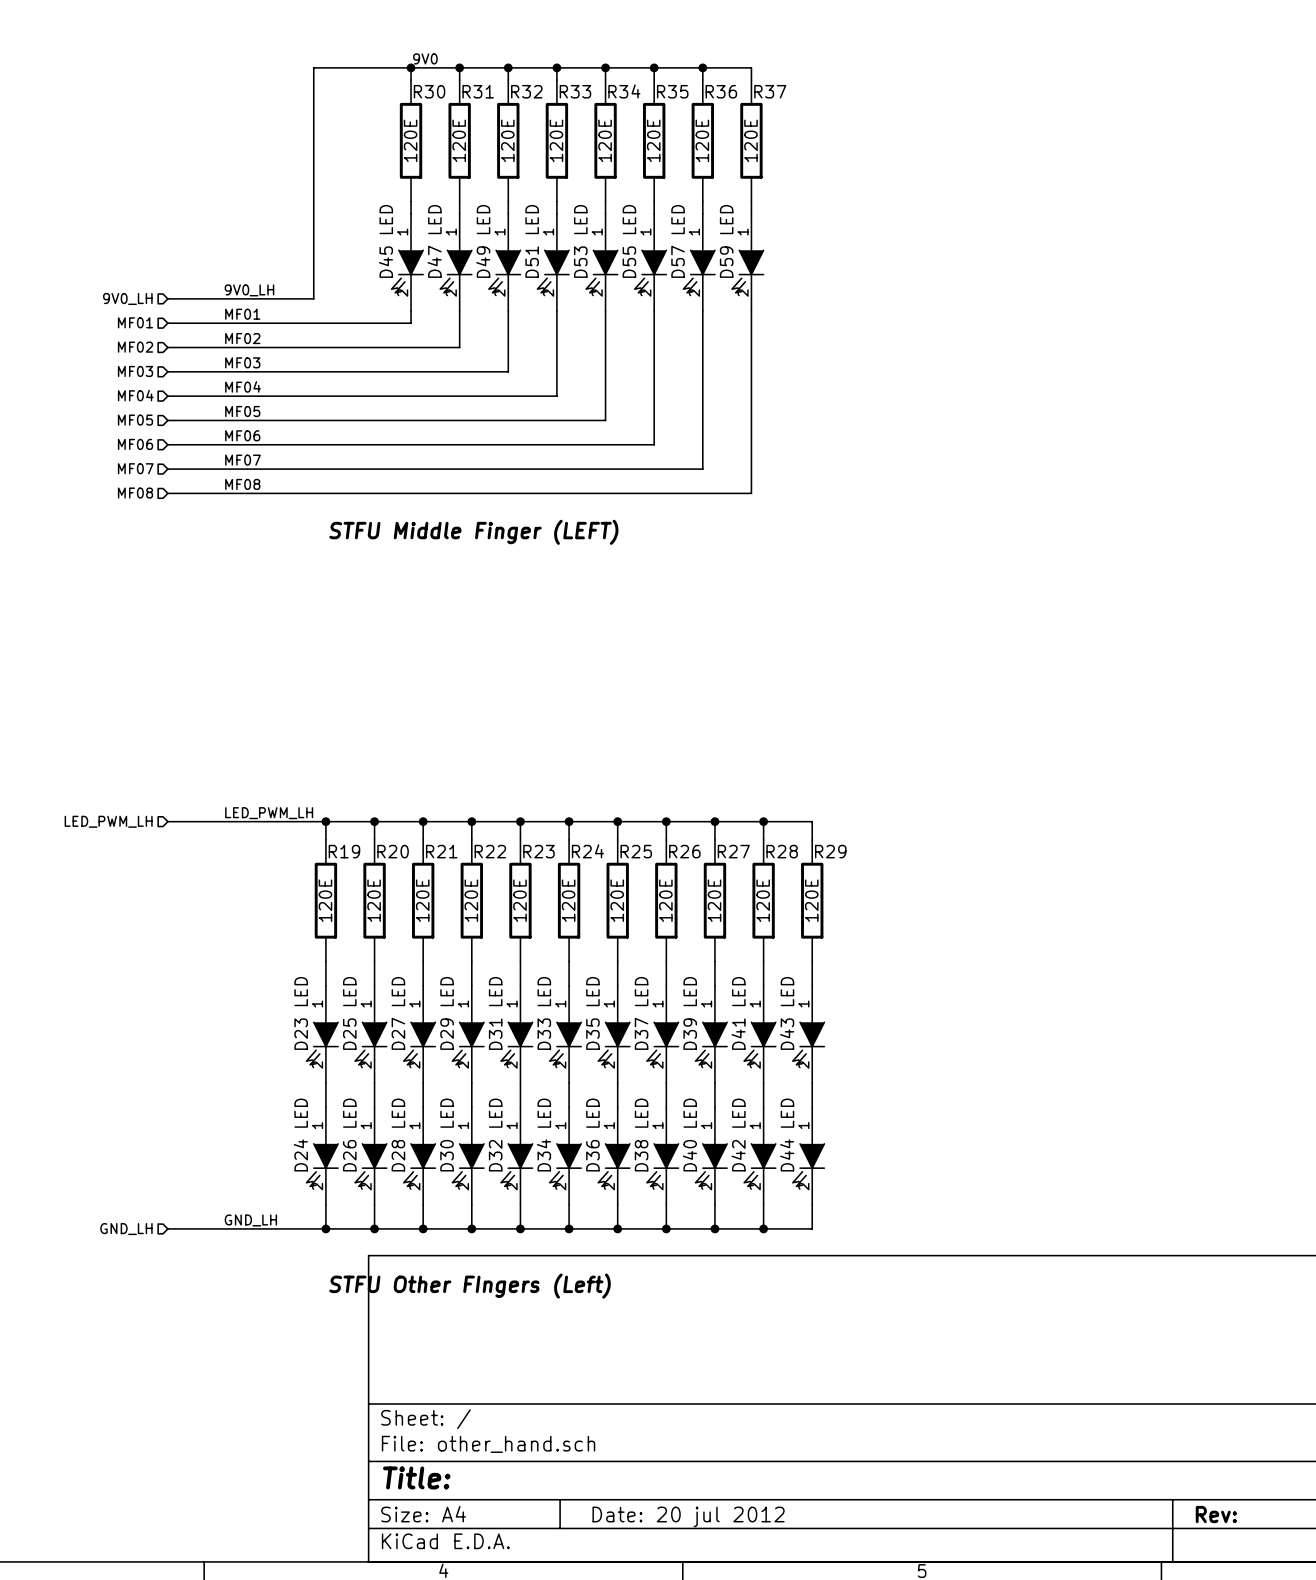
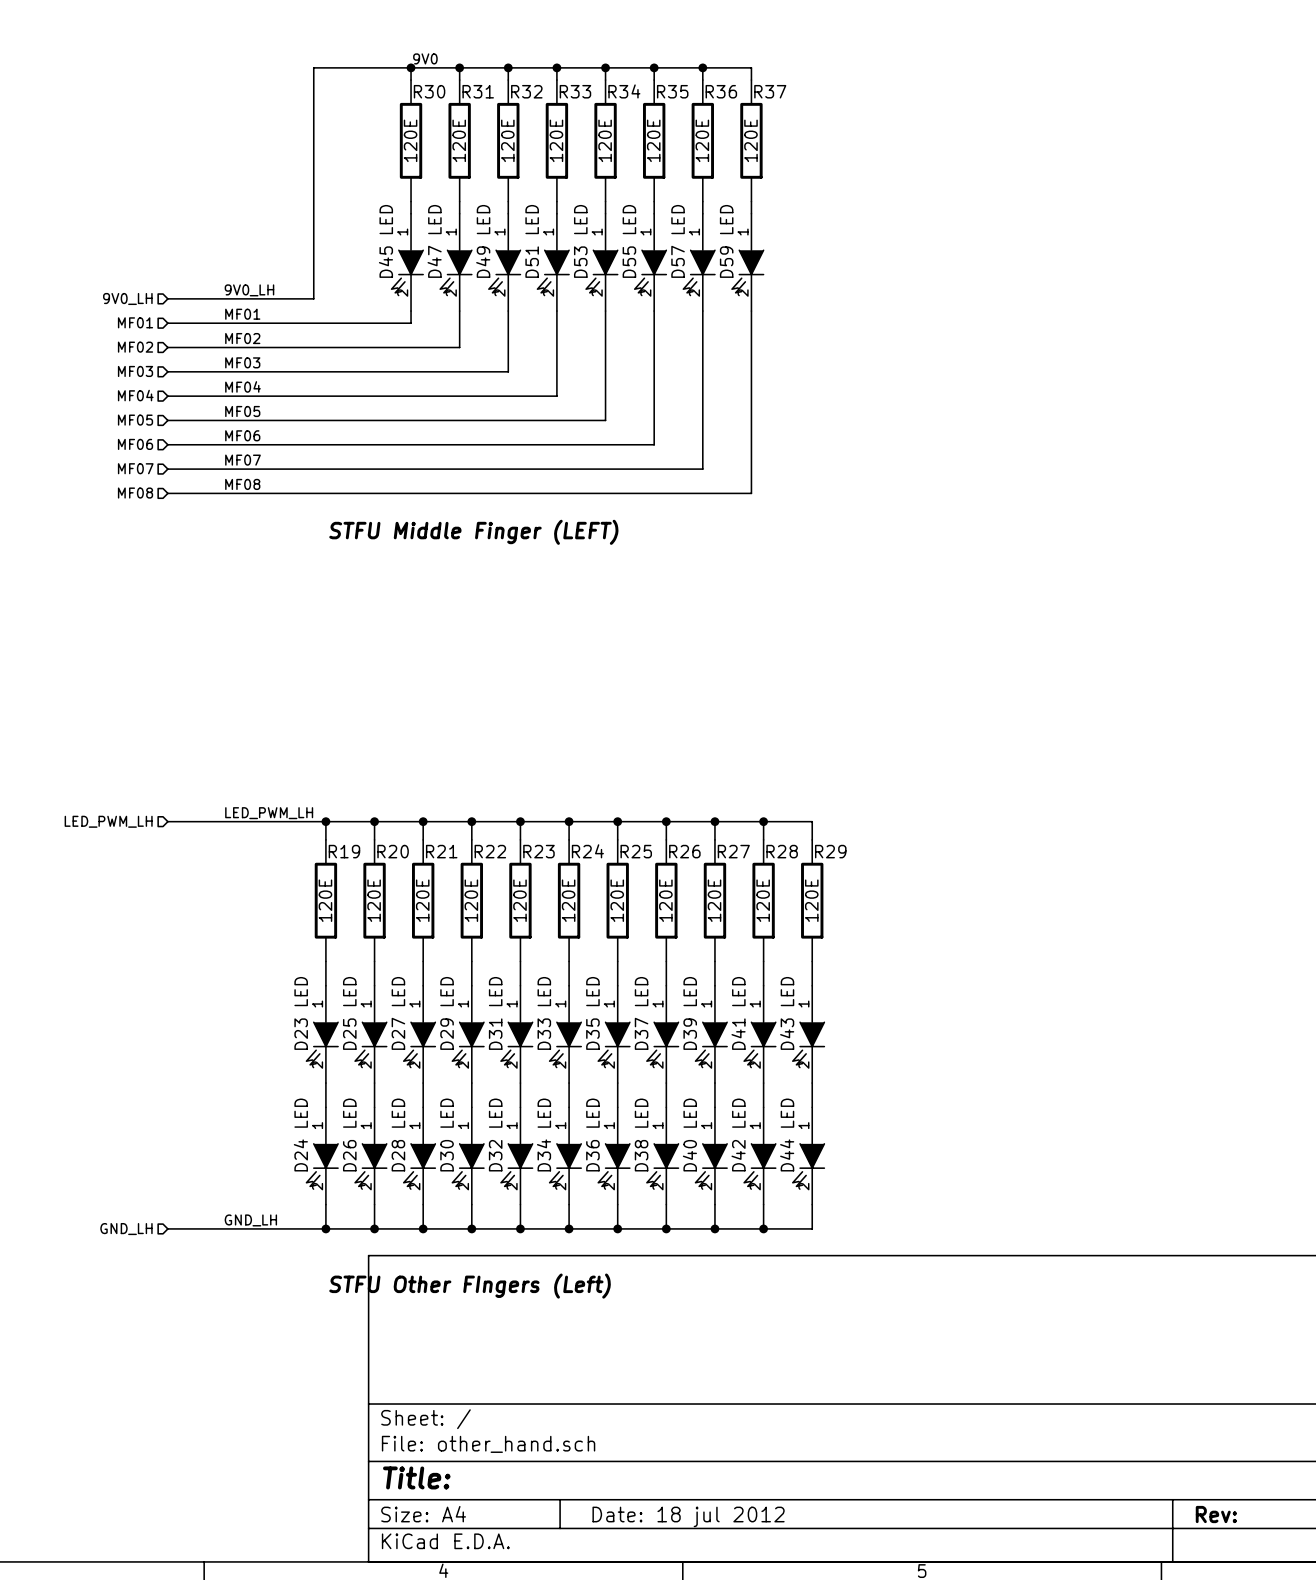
title block: Date: 20 jul 2012 (688, 1516) -> Date: 18 jul 2012 (688, 1516)

